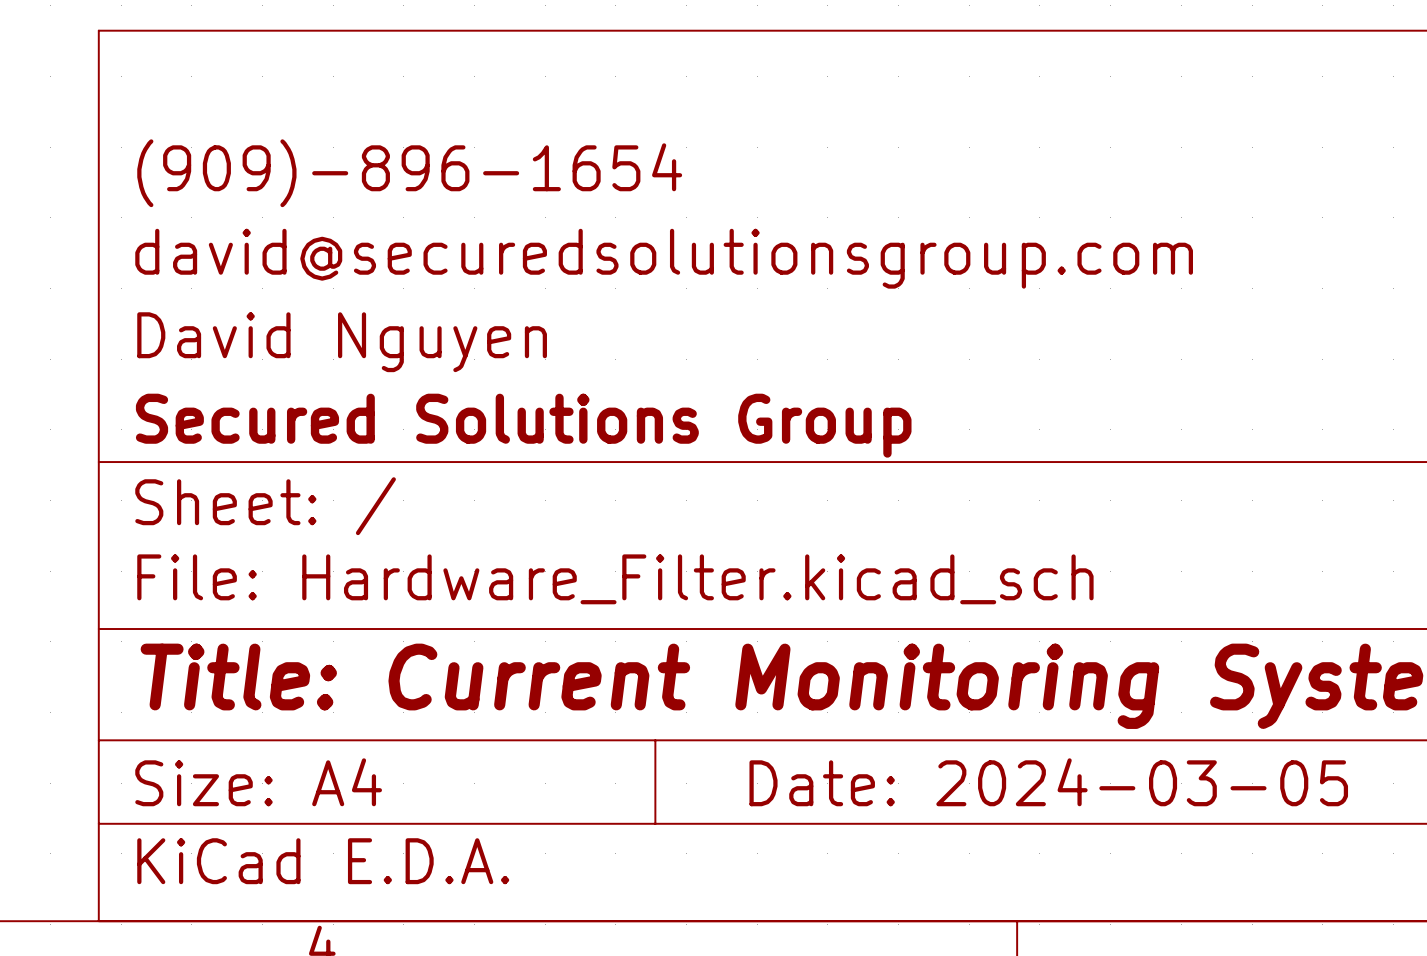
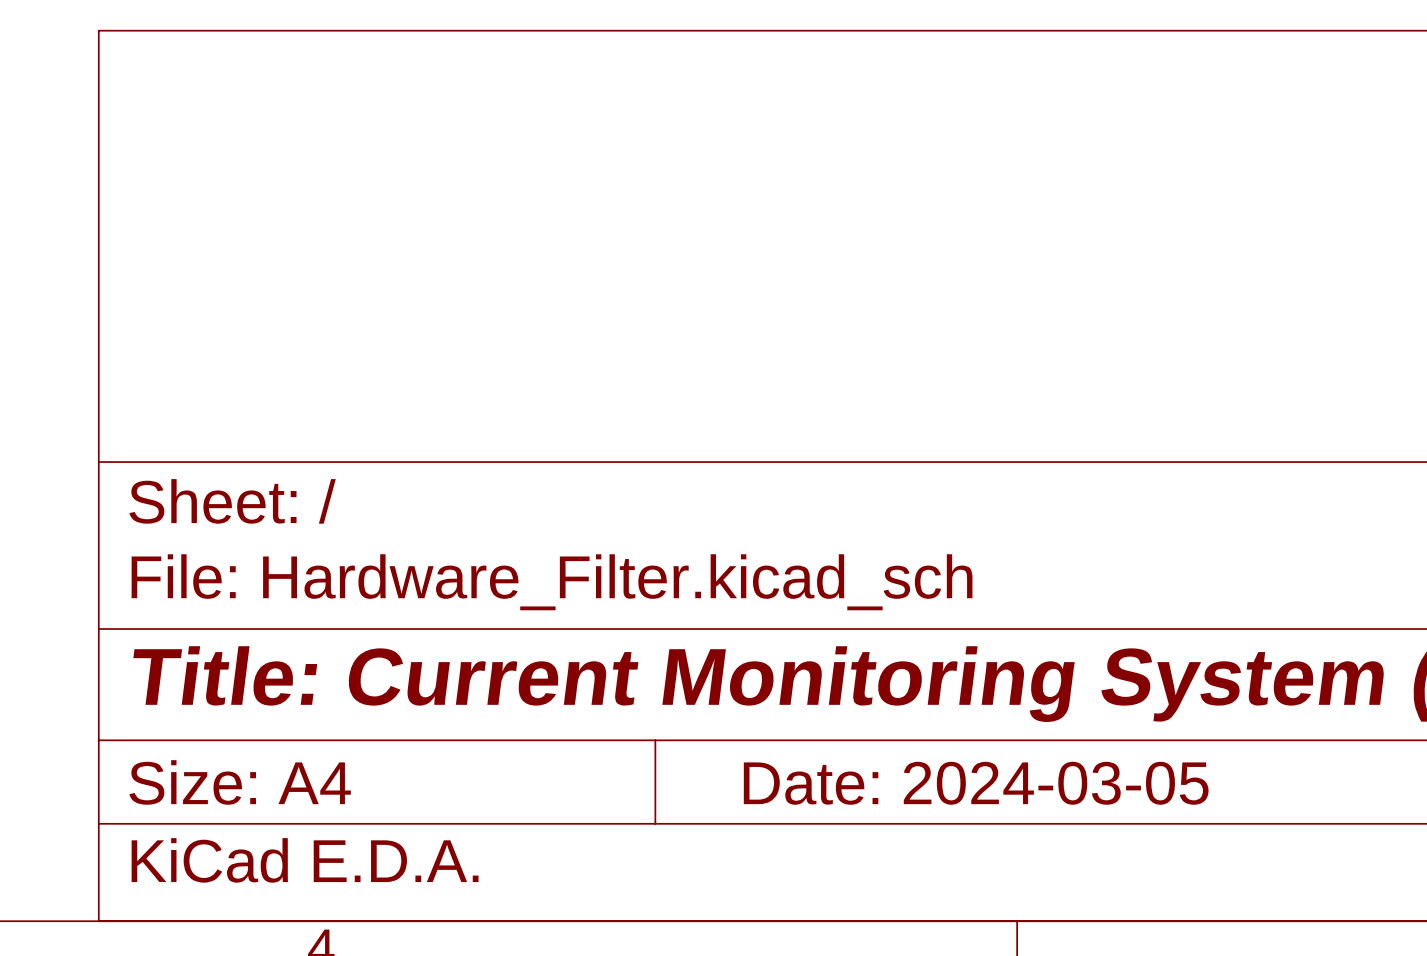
title block: (909)-896-1654 (409, 173) -> none
title block: david@securedsolutionsgroup.com (664, 258) -> none
title block: David Nguyen (342, 342) -> none
title block: Secured Solutions Group (523, 425) -> none

